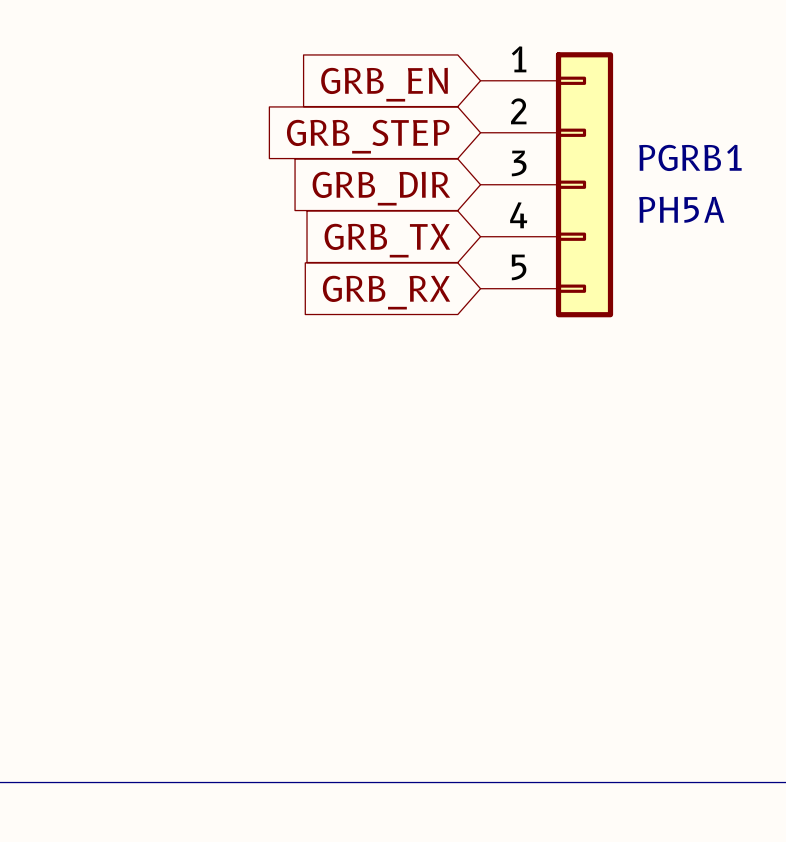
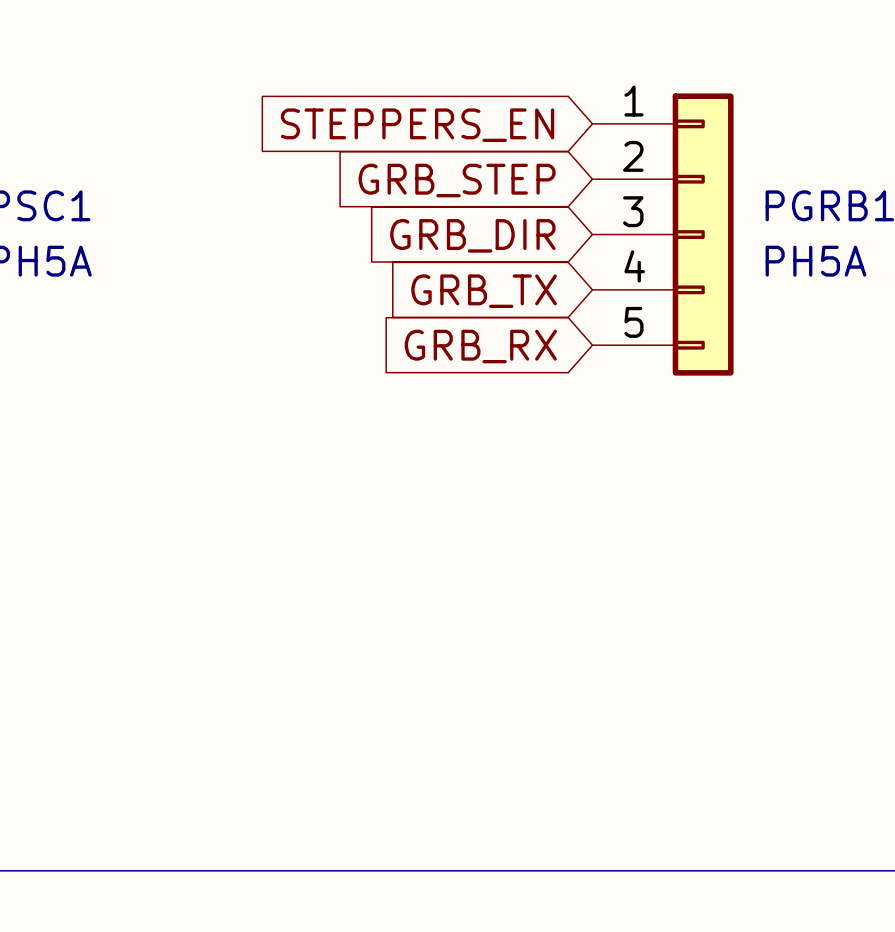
global label: GRB_EN (384, 84) -> STEPPERS_EN (417, 125)

